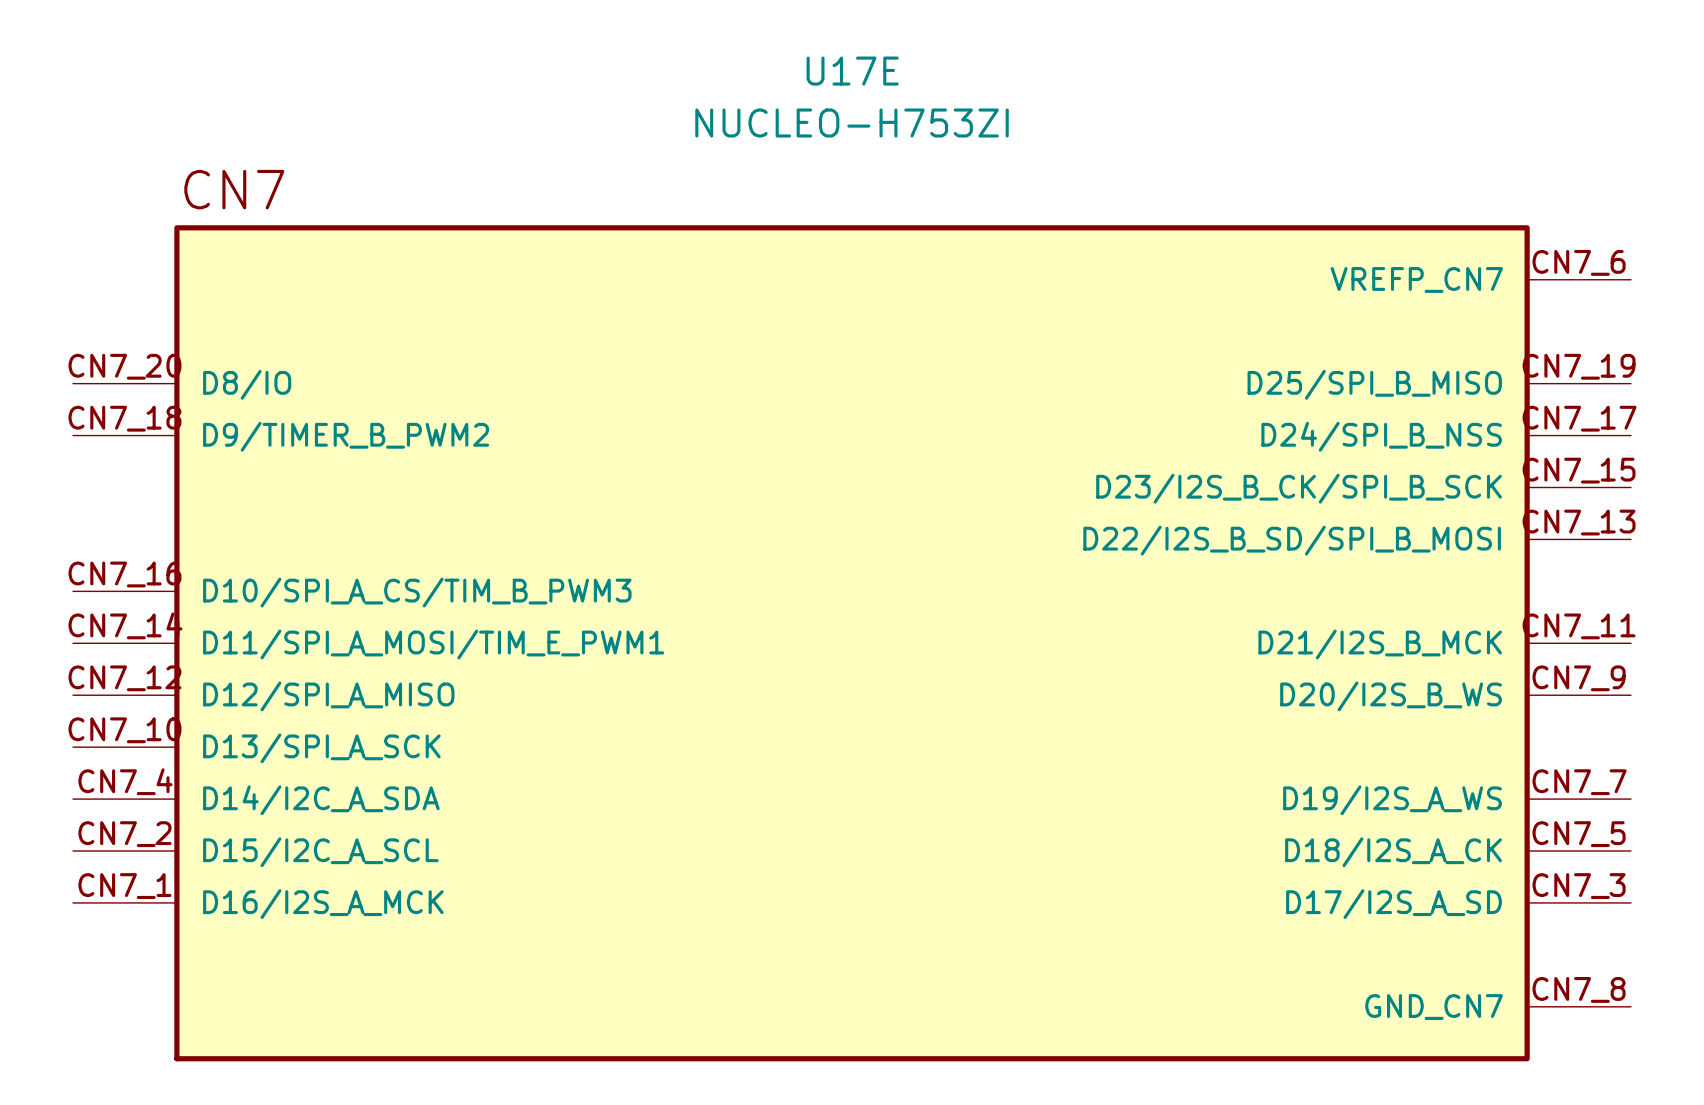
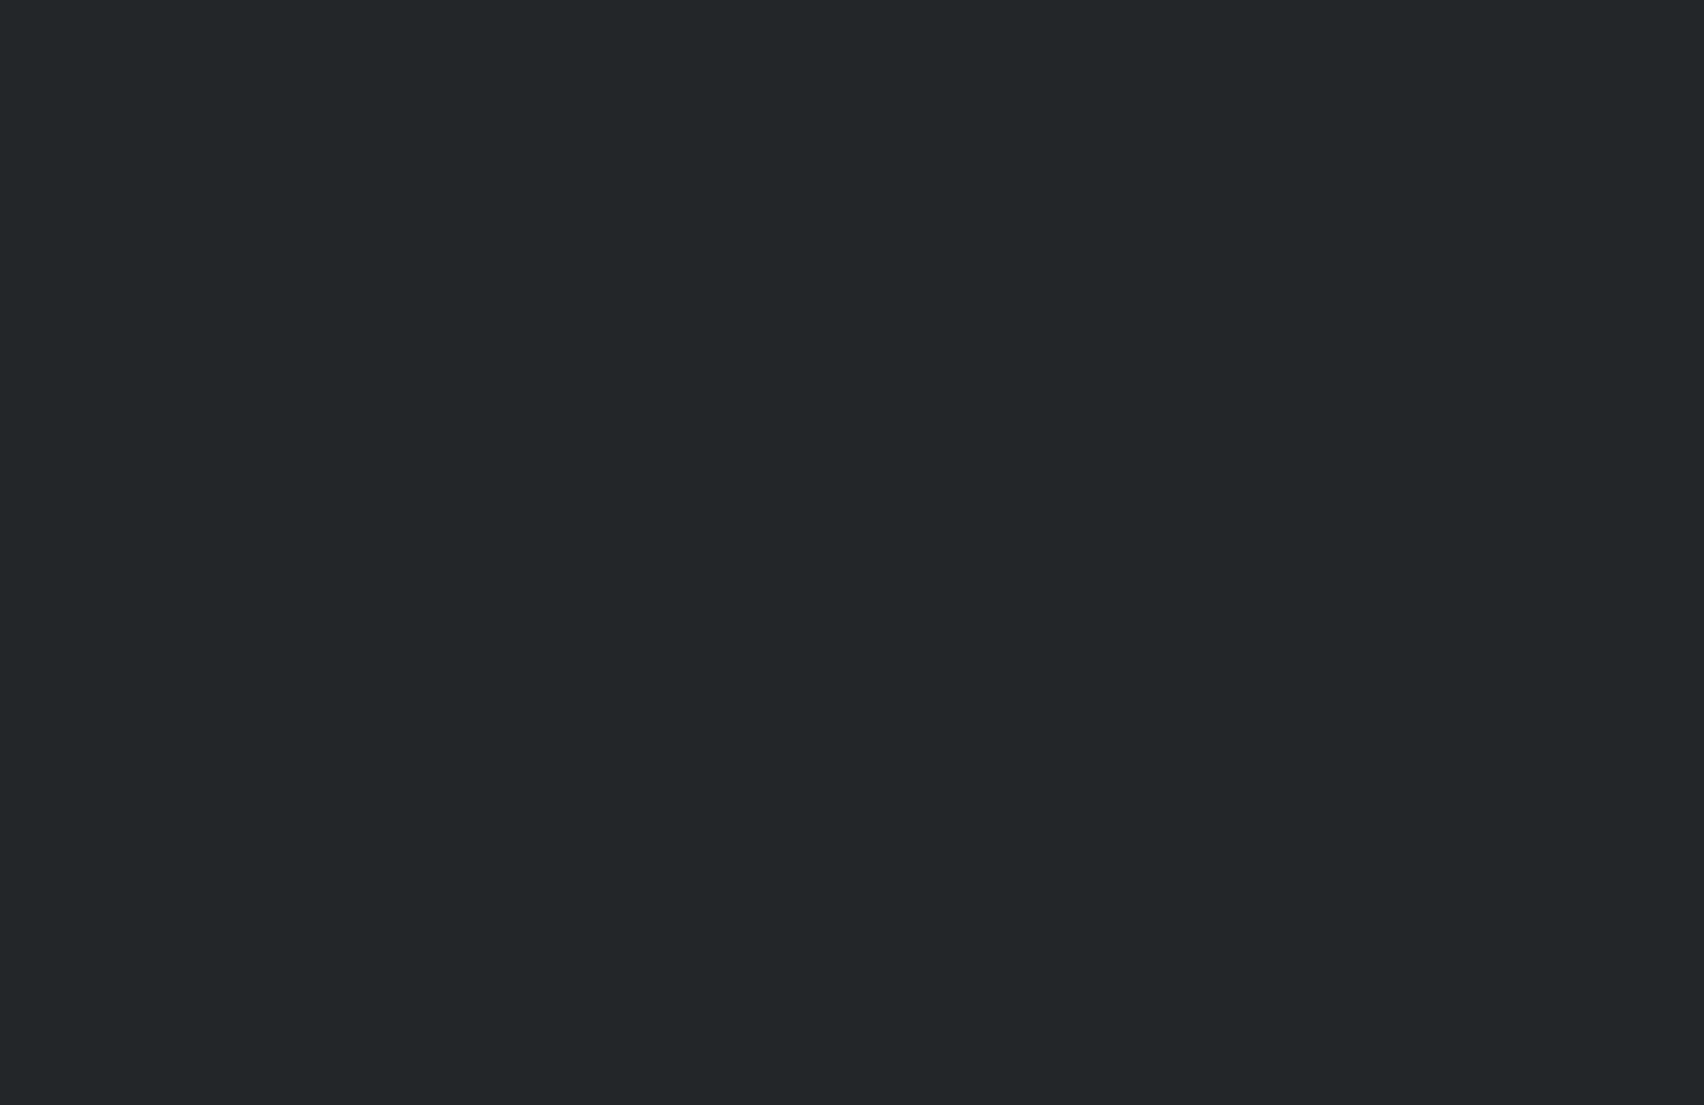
U17E: NUCLEO-H753ZI (852, 643) -> none

